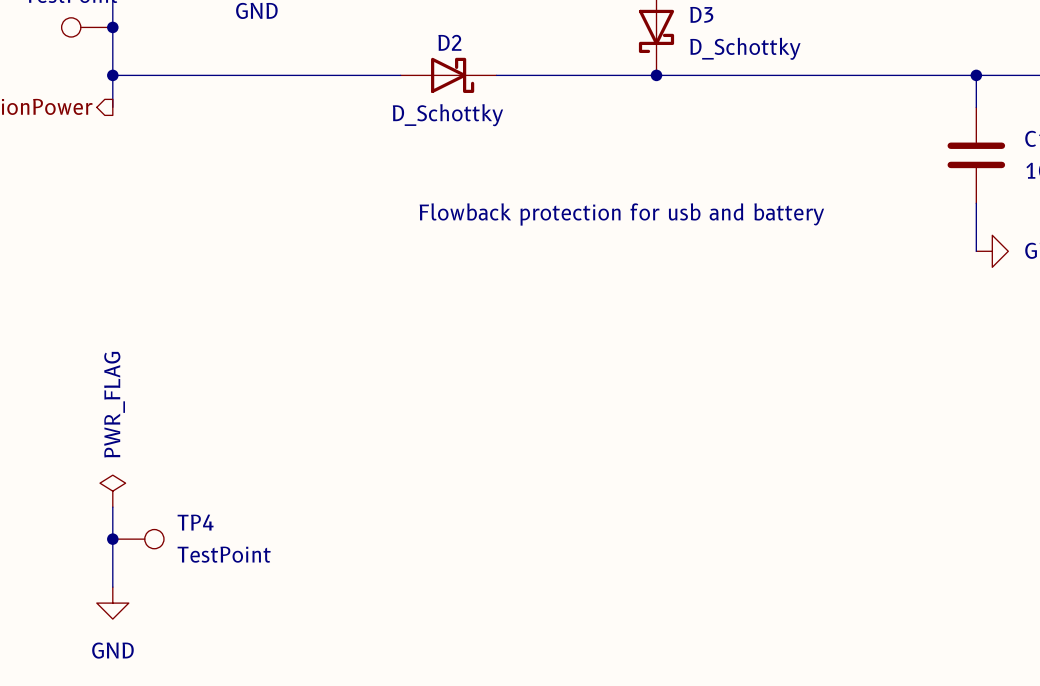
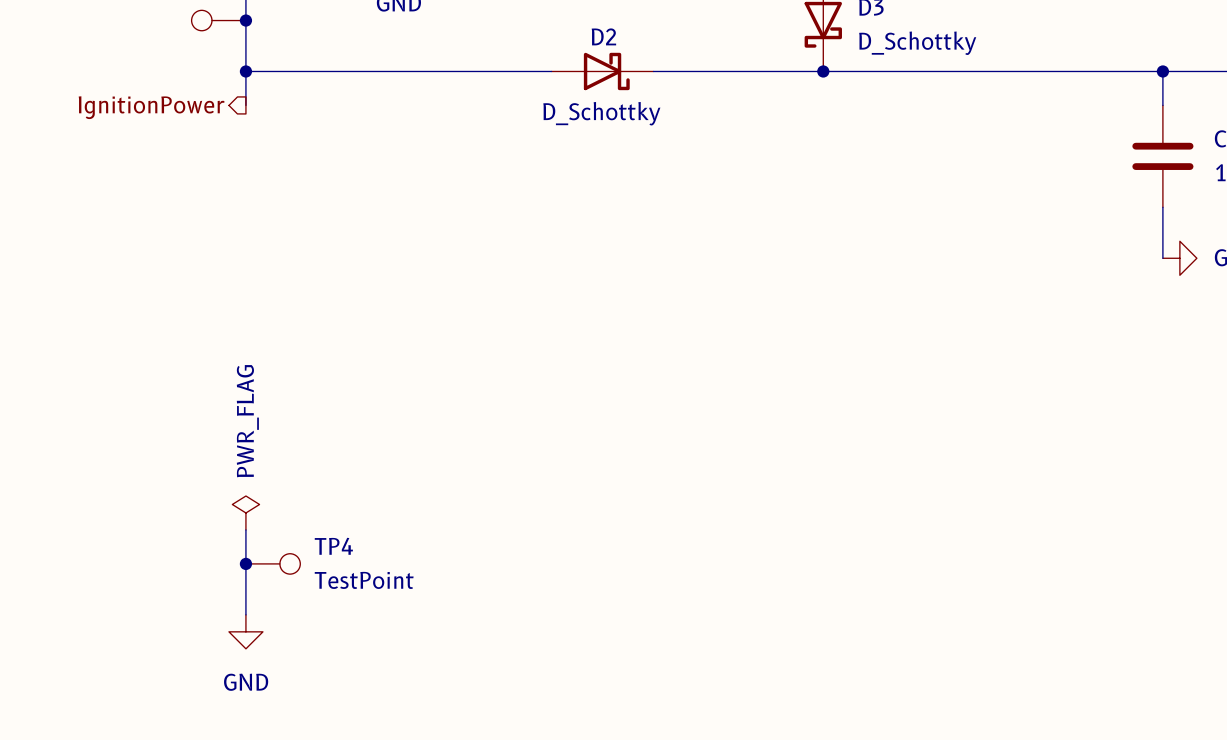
text: Flowback protection for usb and battery (621, 214) -> none

